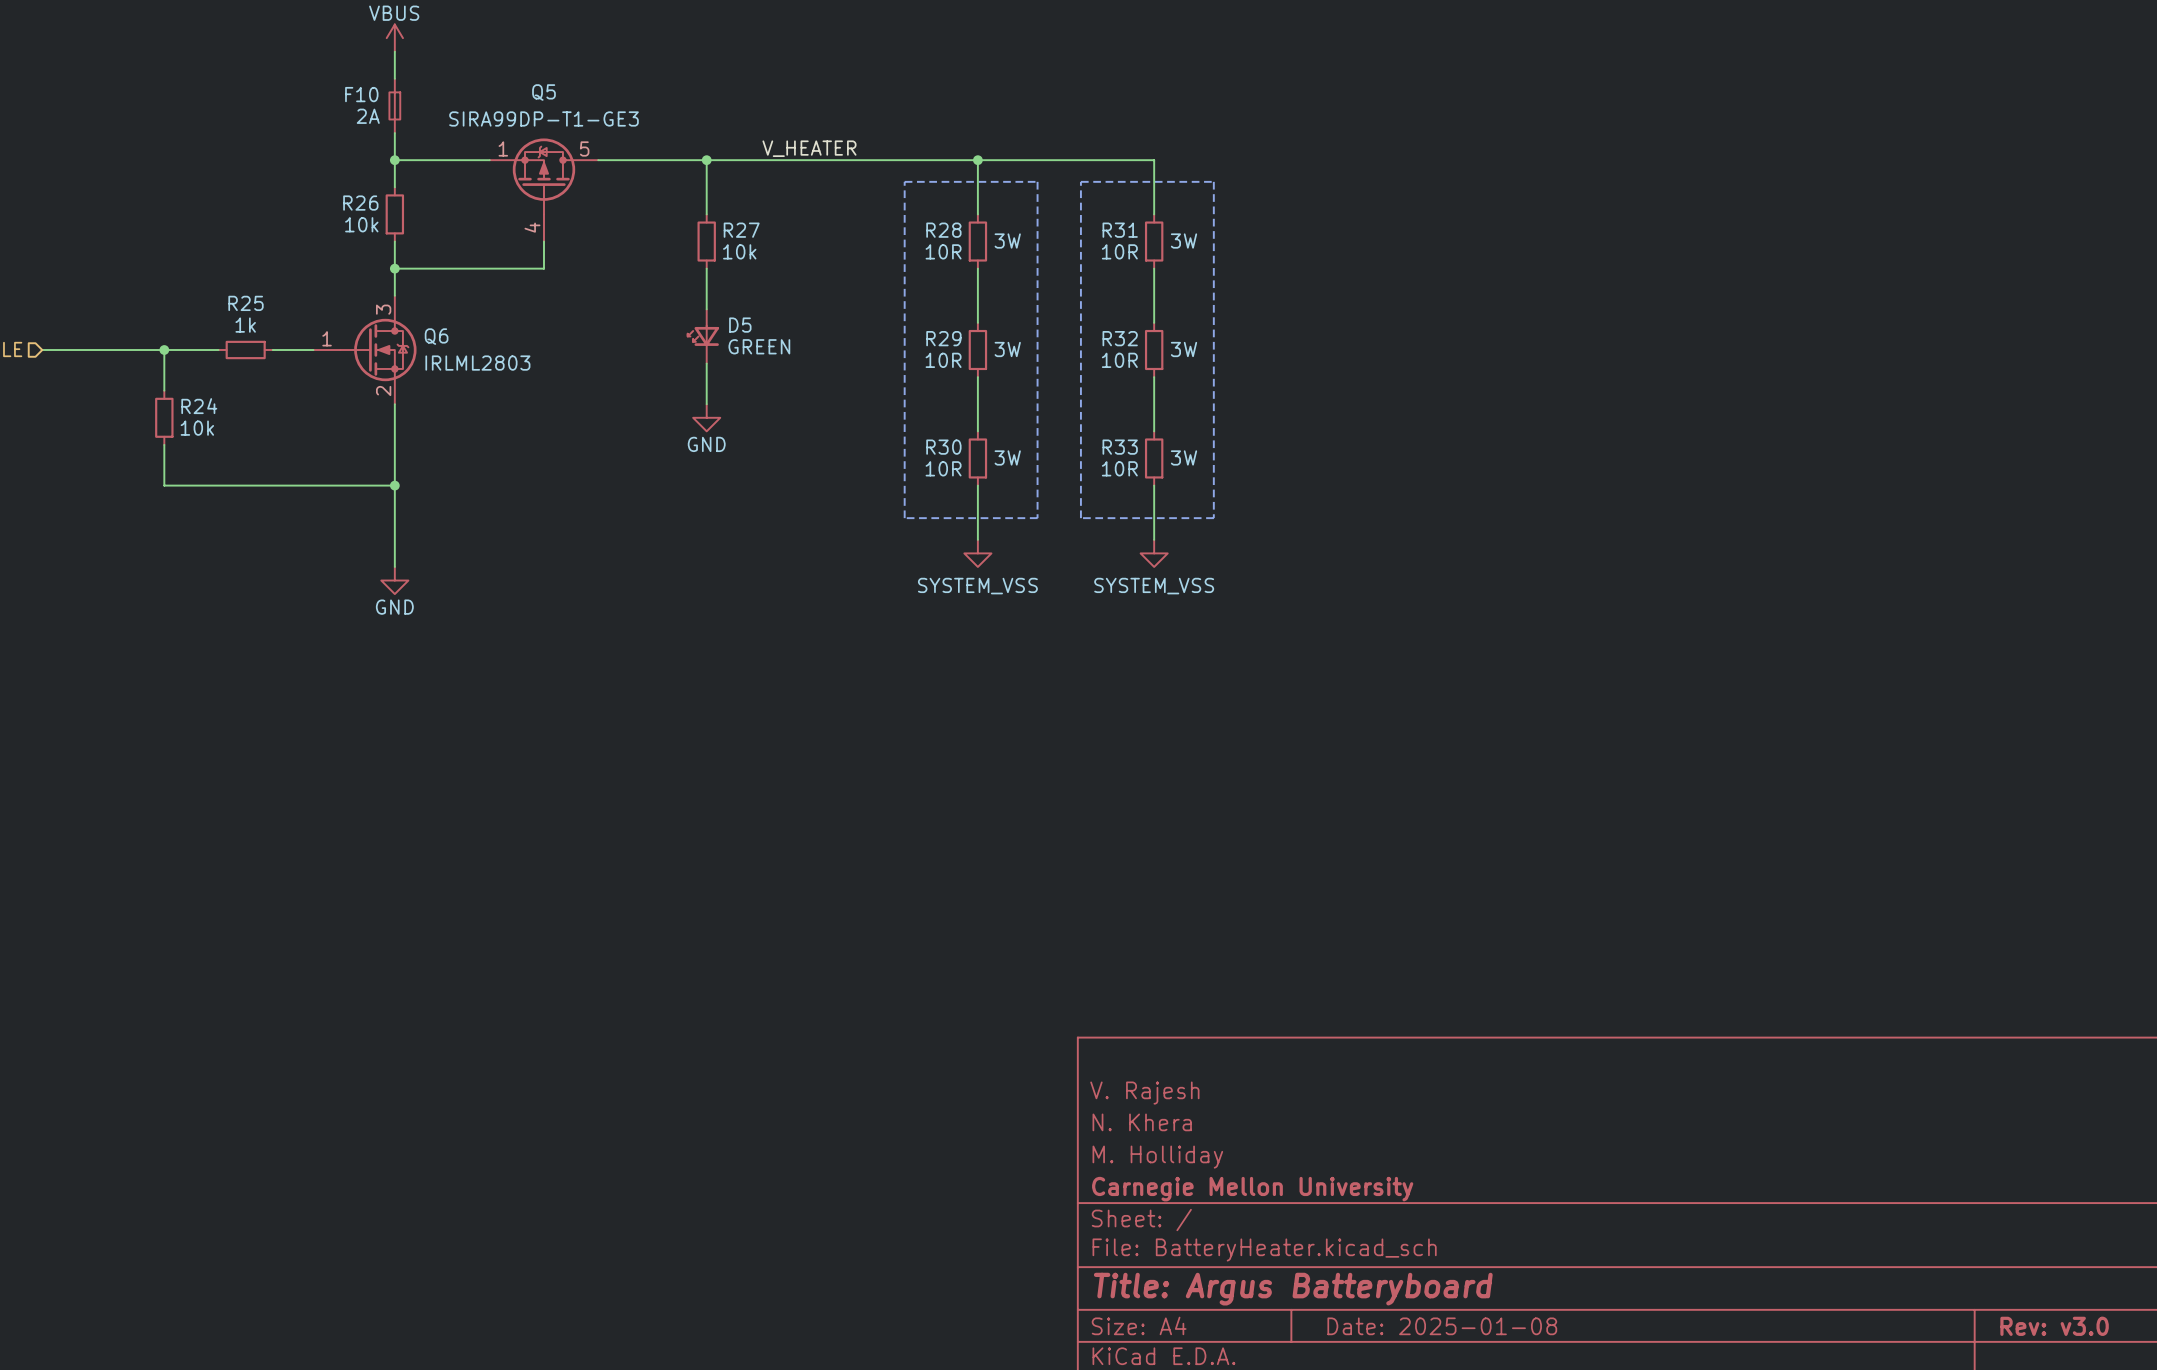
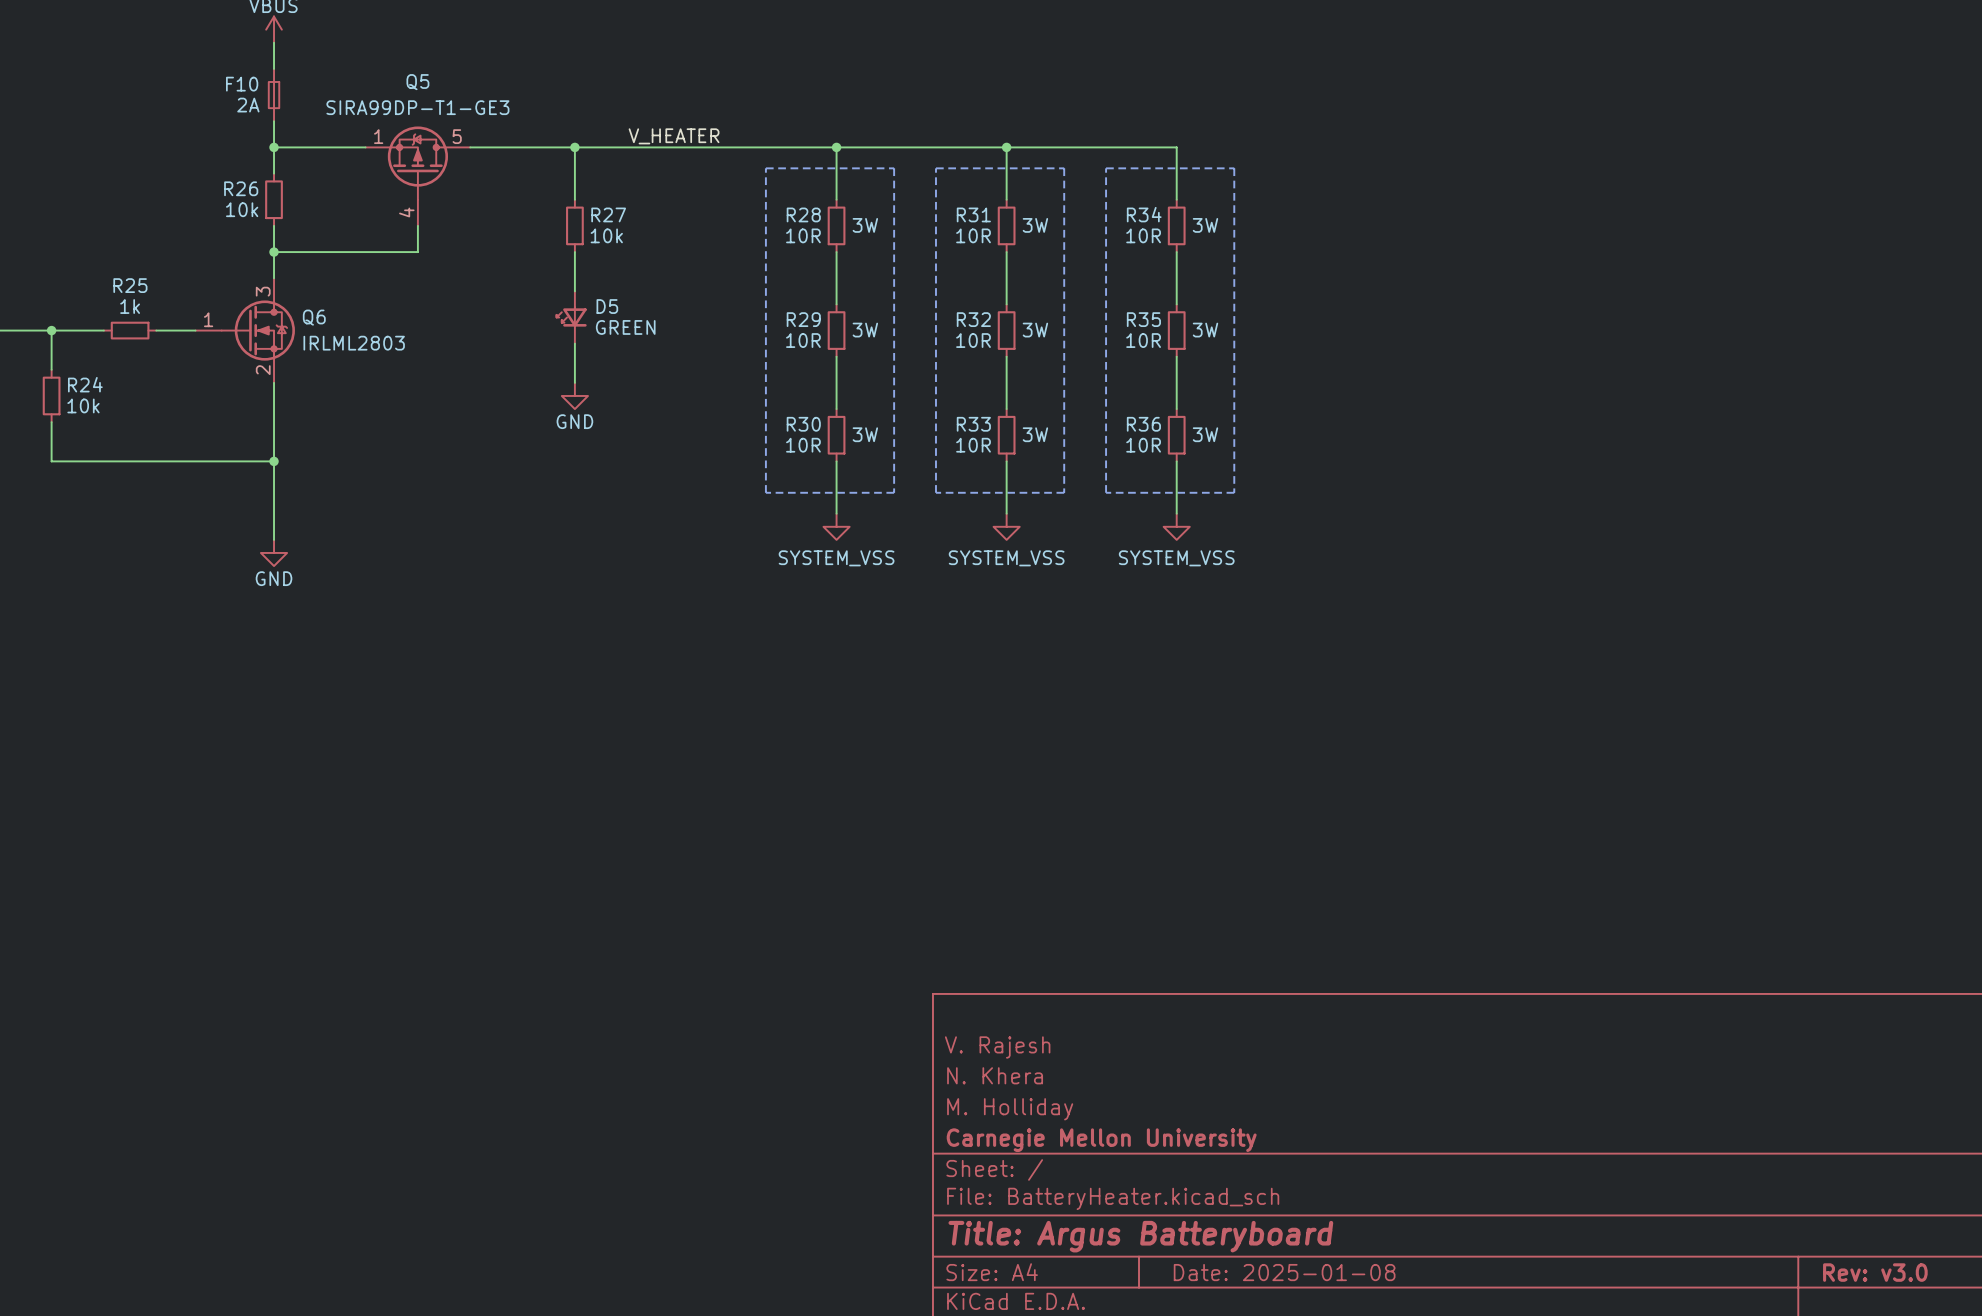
wire: none -> (1006, 147) (1176, 147) (1176, 199)
junction: none -> (1006, 147)
line: none -> (1106, 168) (1234, 168) (1234, 492) (1106, 492) (1106, 168)
R34: none -> 10R (1176, 225)
wire: none -> (1176, 252) (1176, 304)
R35: none -> 10R (1176, 330)
wire: none -> (1176, 356) (1176, 409)
R36: none -> 10R (1176, 435)
wire: none -> (1176, 461) (1176, 513)
power symbol: none -> SYSTEM_VSS (1176, 526)

